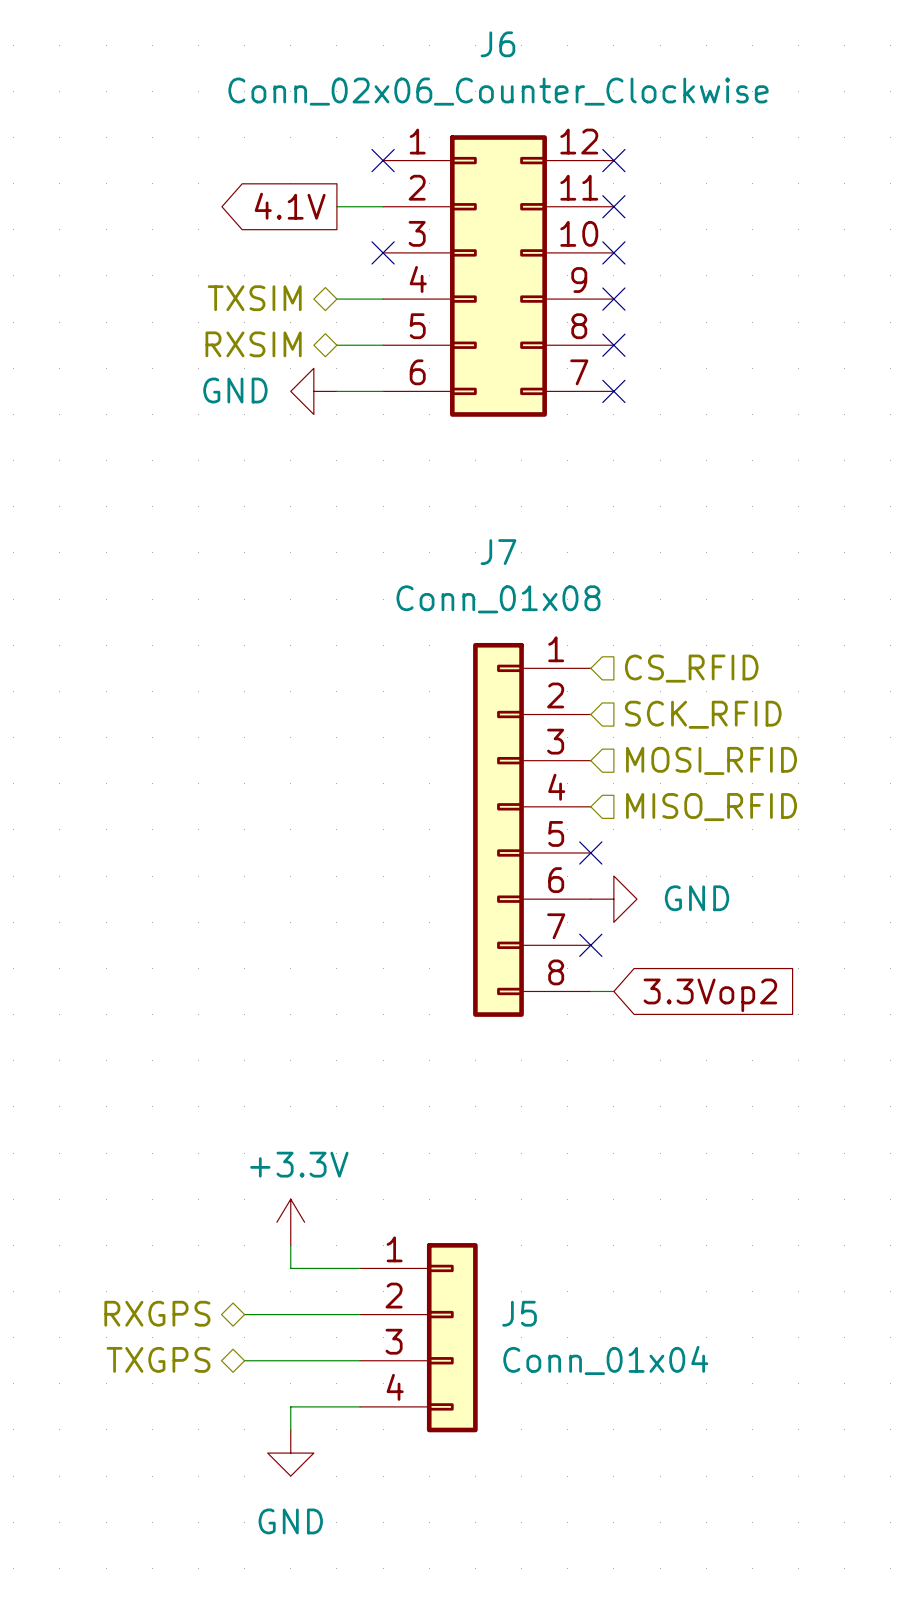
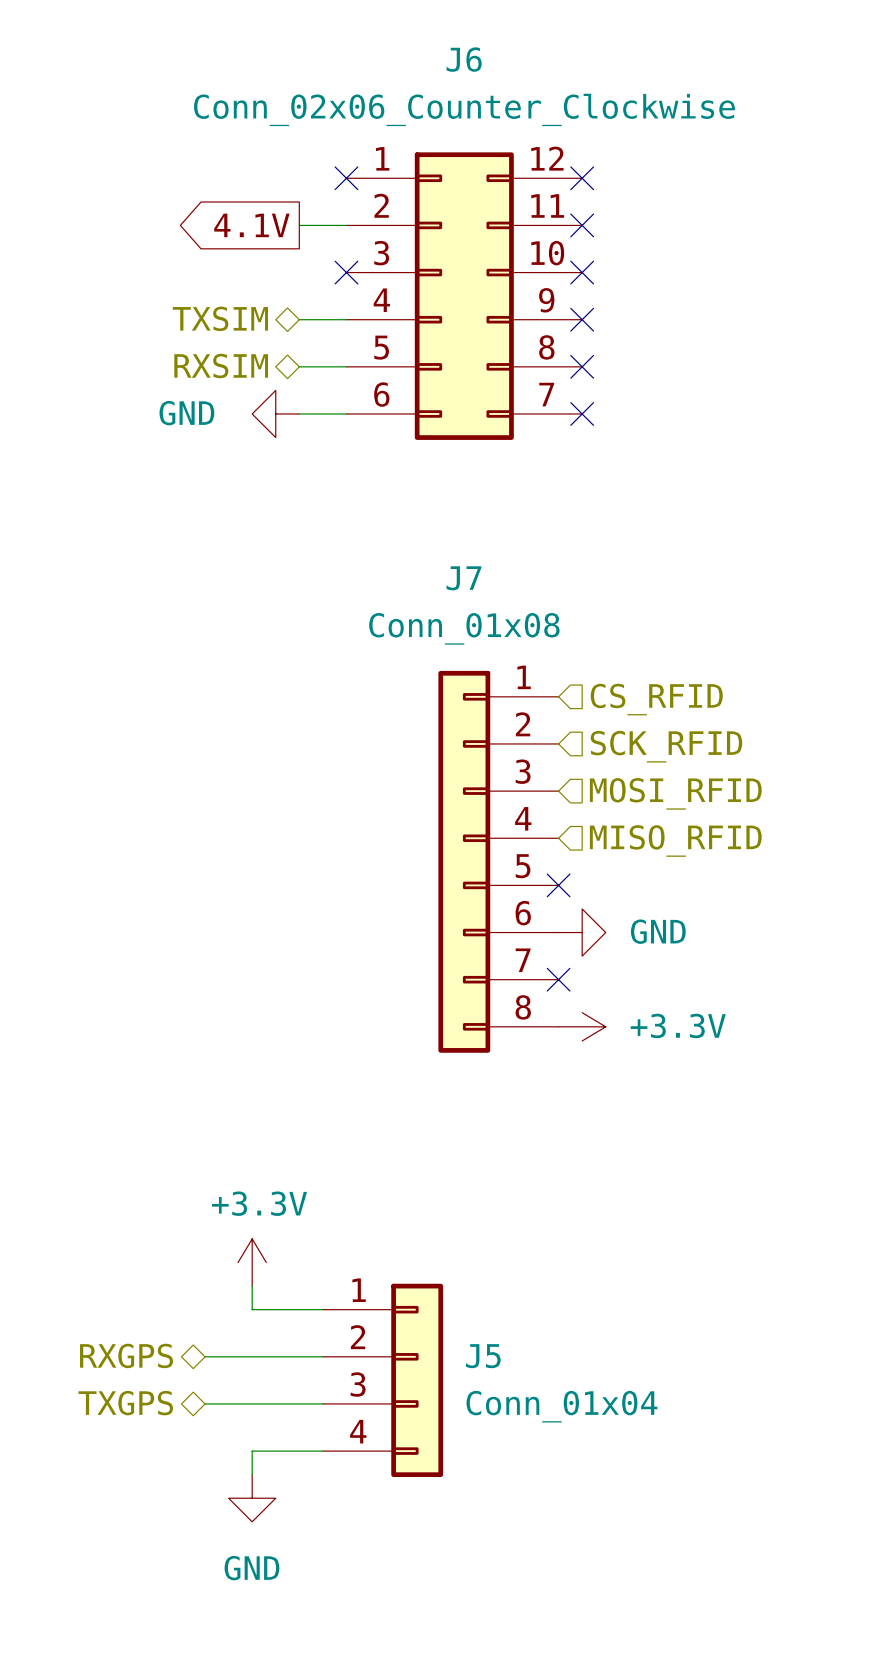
power symbol: none -> +3.3V (582, 1026)
global label: 3.3Vop2 (710, 995) -> none

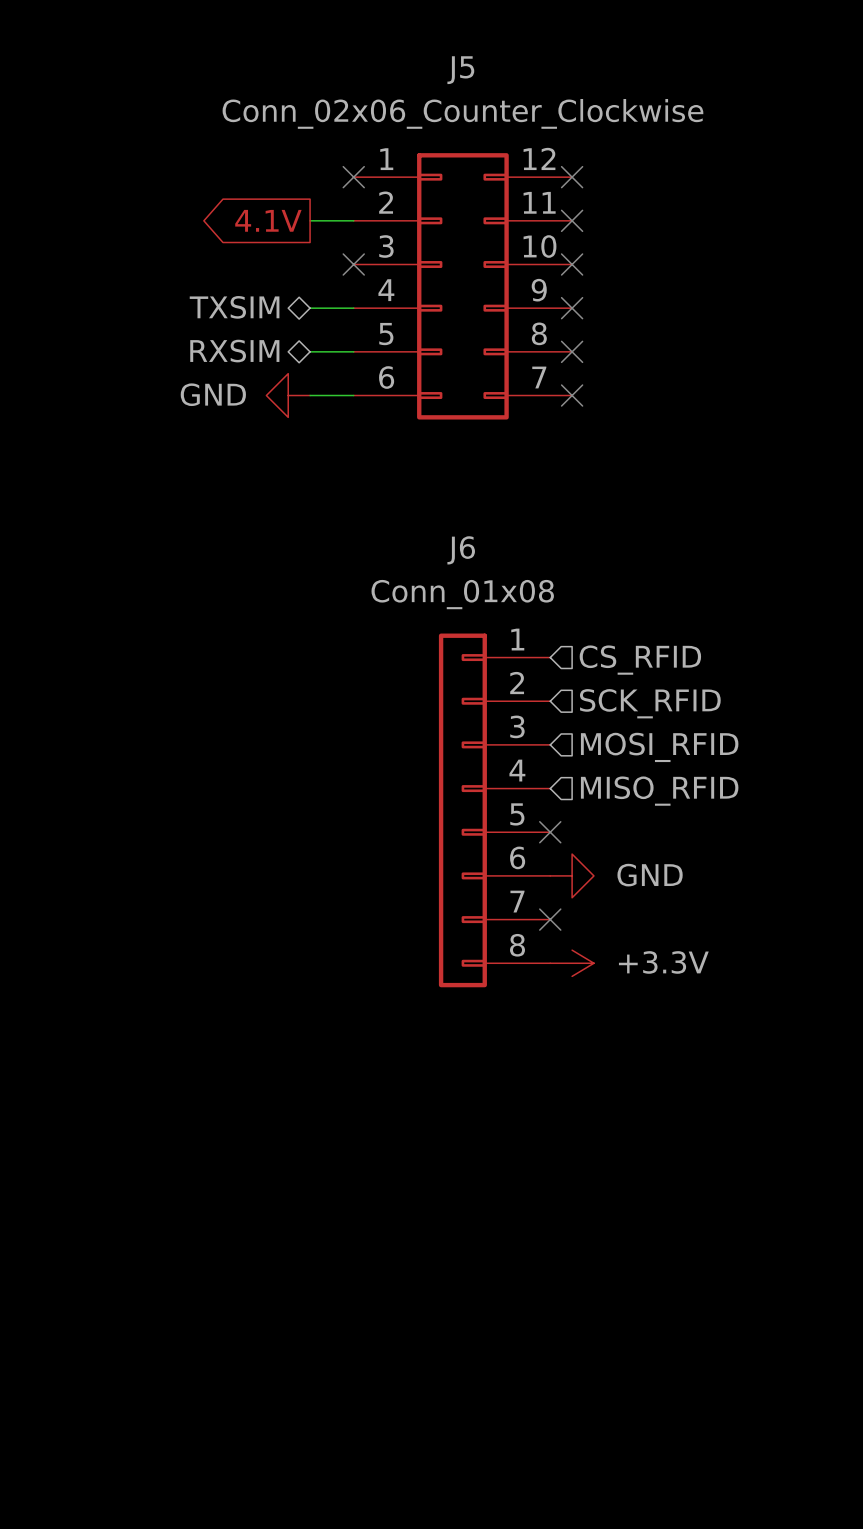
J6 name: J6 (464, 59) -> J5 (460, 70)
J7 name: J7 (463, 578) -> J6 (461, 550)
power symbol: +3.3V (252, 1262) -> none
wire: (252, 1286) (252, 1309) (322, 1309) -> none
hierarchical label: RXGPS (126, 1355) -> none
wire: (205, 1356) (322, 1356) -> none
J5: Conn_01x04 (382, 1380) -> none
hierarchical label: TXGPS (125, 1403) -> none
wire: (205, 1403) (322, 1403) -> none
wire: (322, 1451) (252, 1451) (252, 1474) -> none
power symbol: GND (252, 1498) -> none

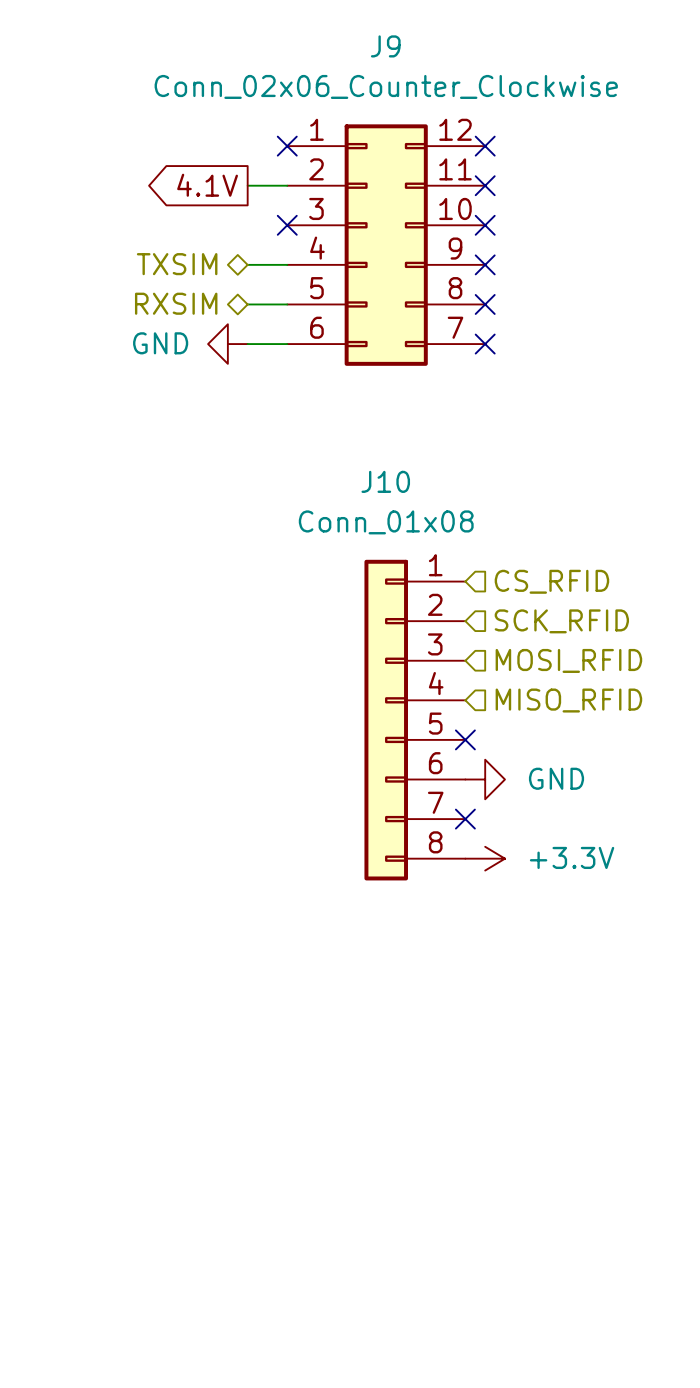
J5 name: J5 (460, 70) -> J9 (385, 46)
J6 name: J6 (461, 550) -> J10 (385, 481)

